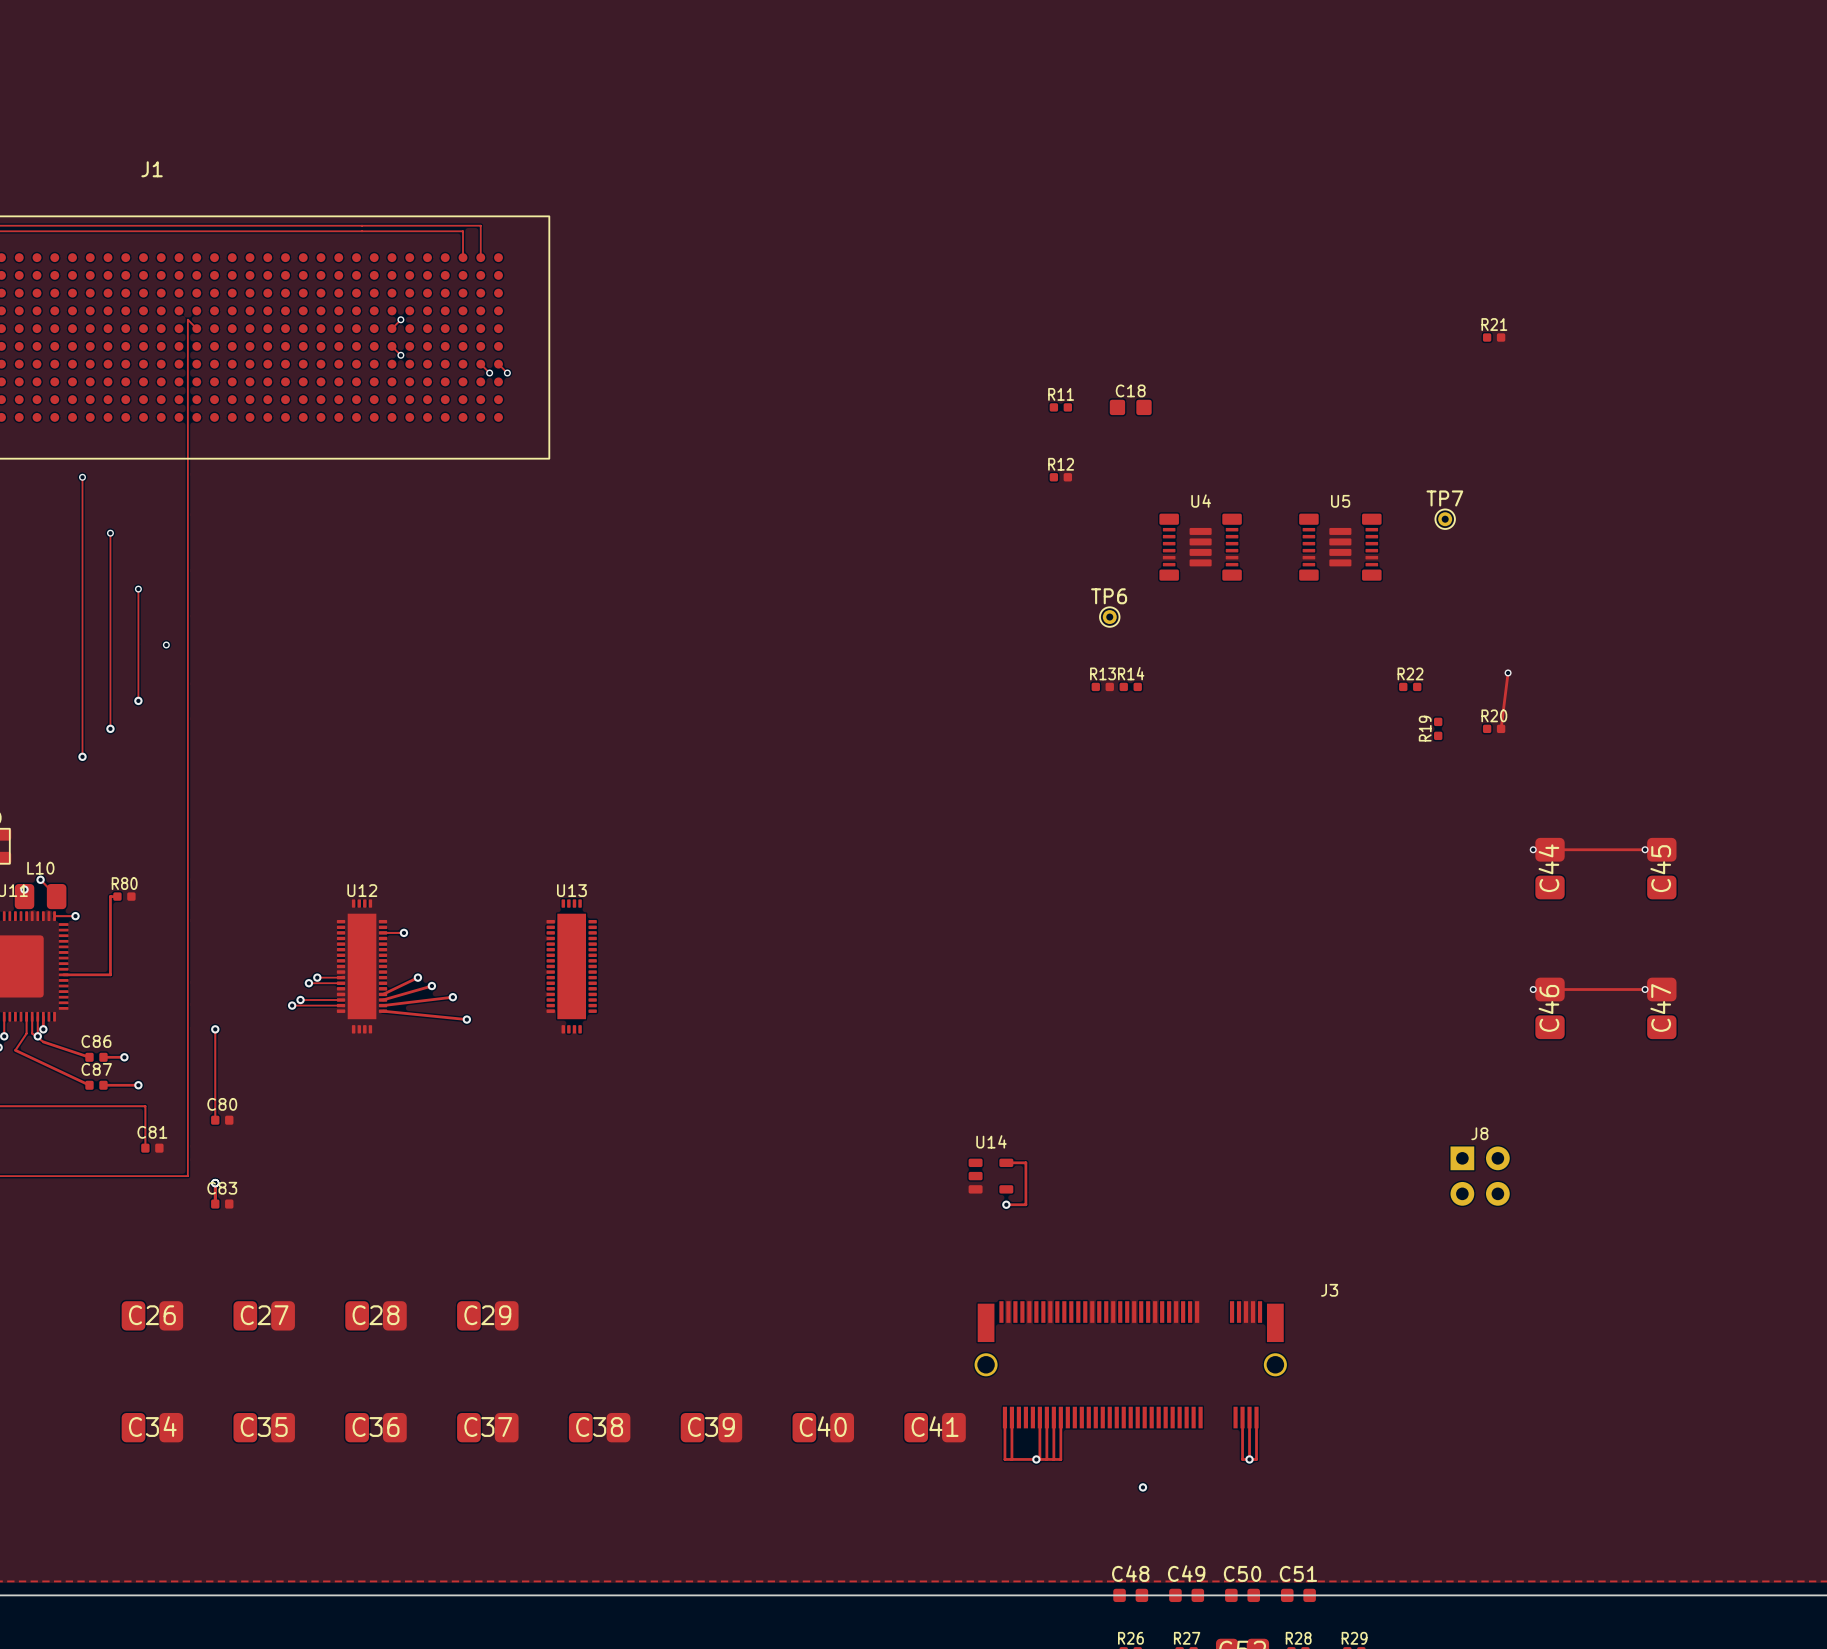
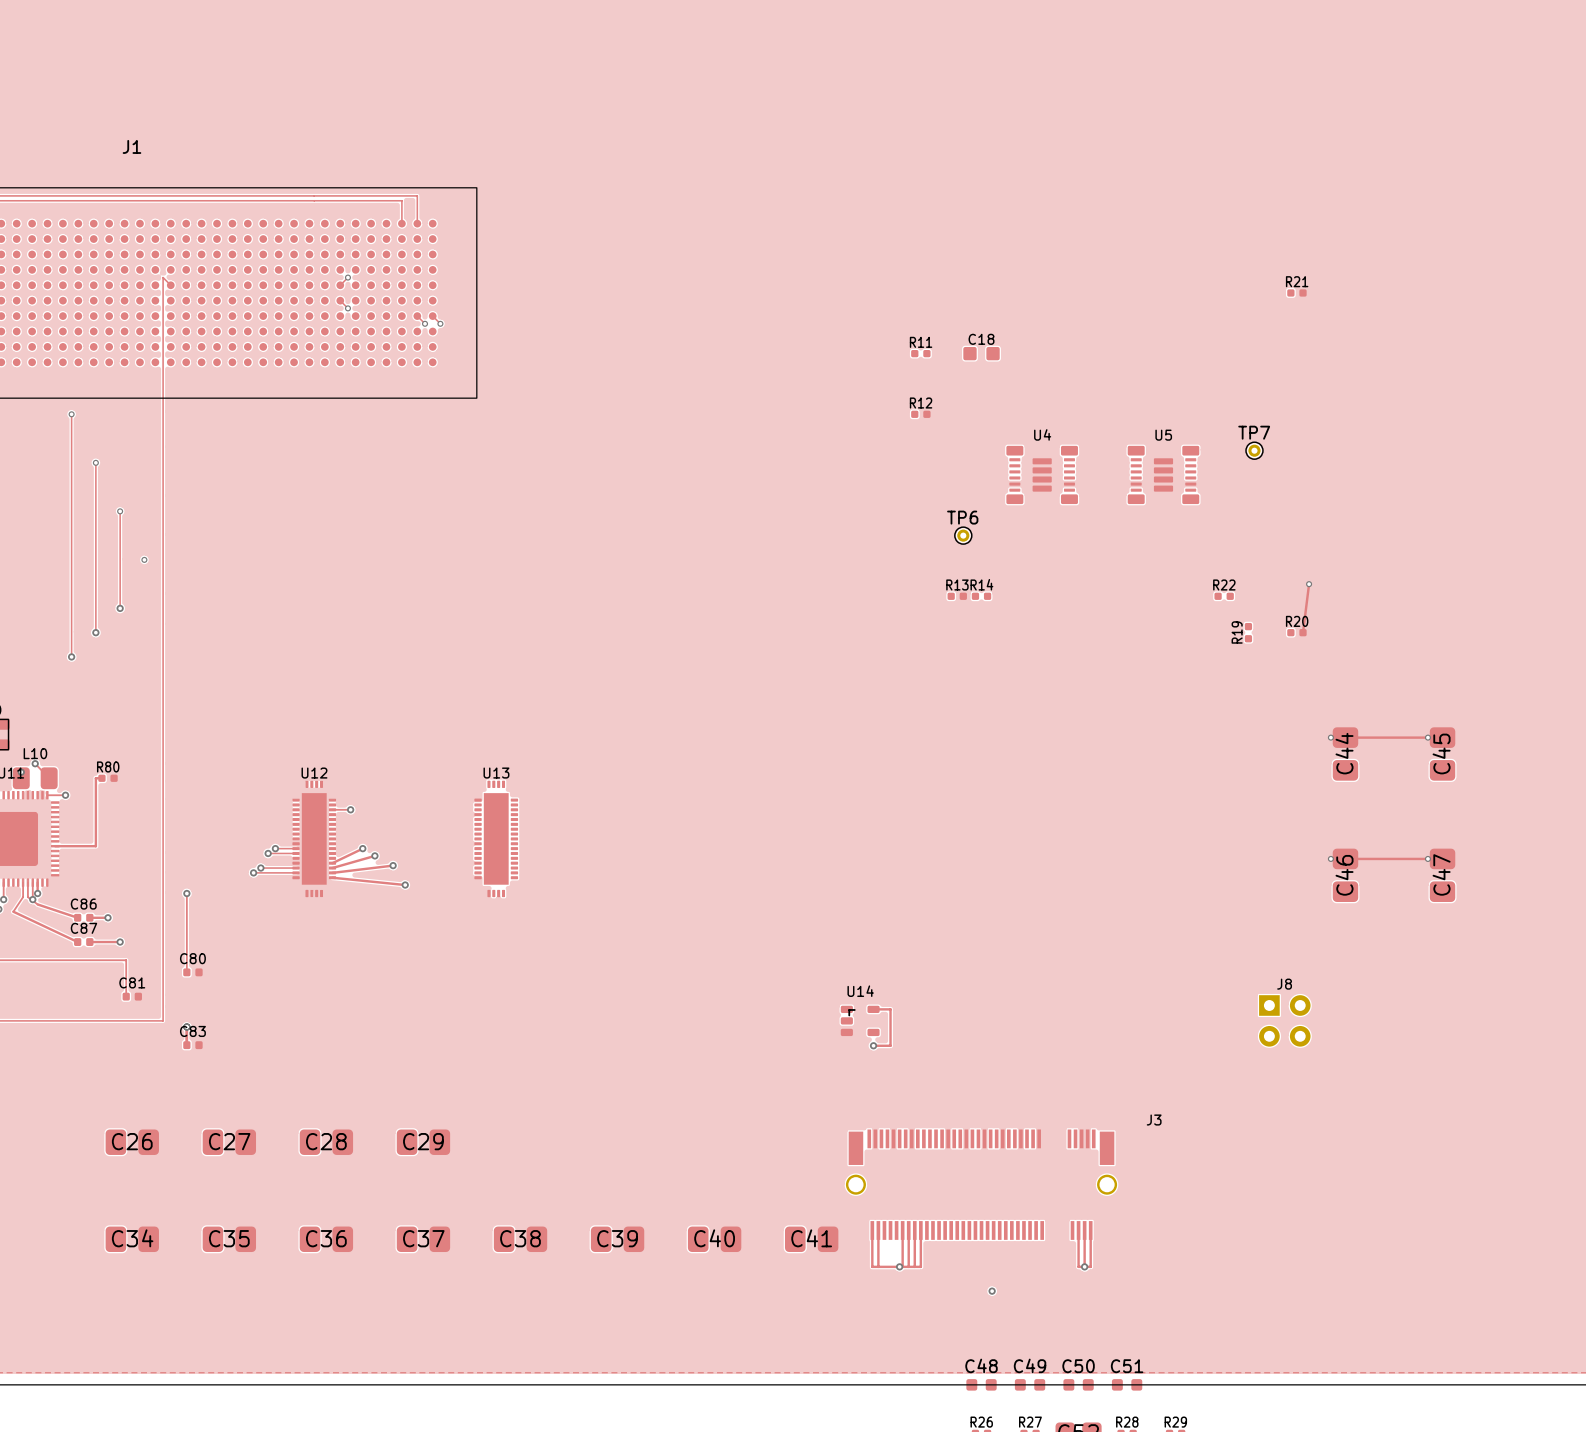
U14 footprint: [968, 1158, 1014, 1194] -> [840, 1005, 880, 1037]

